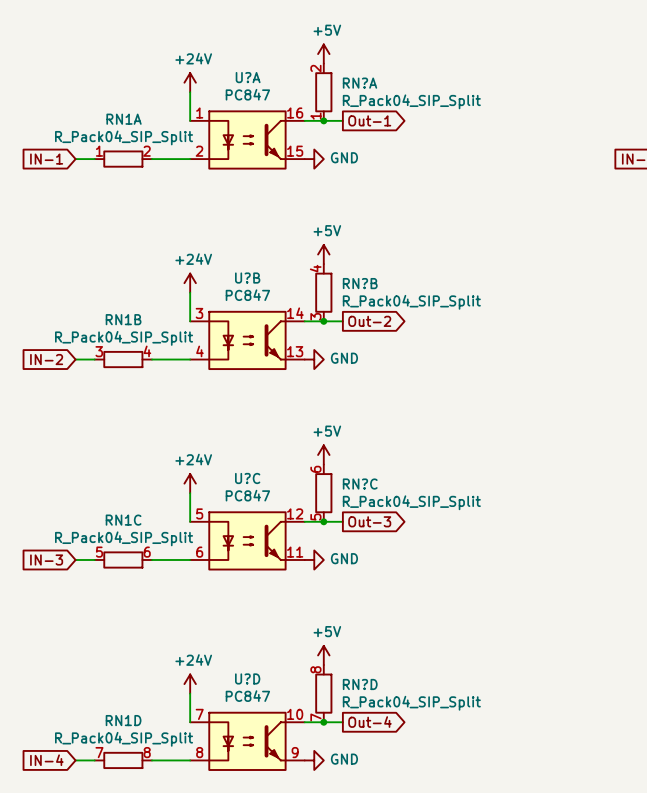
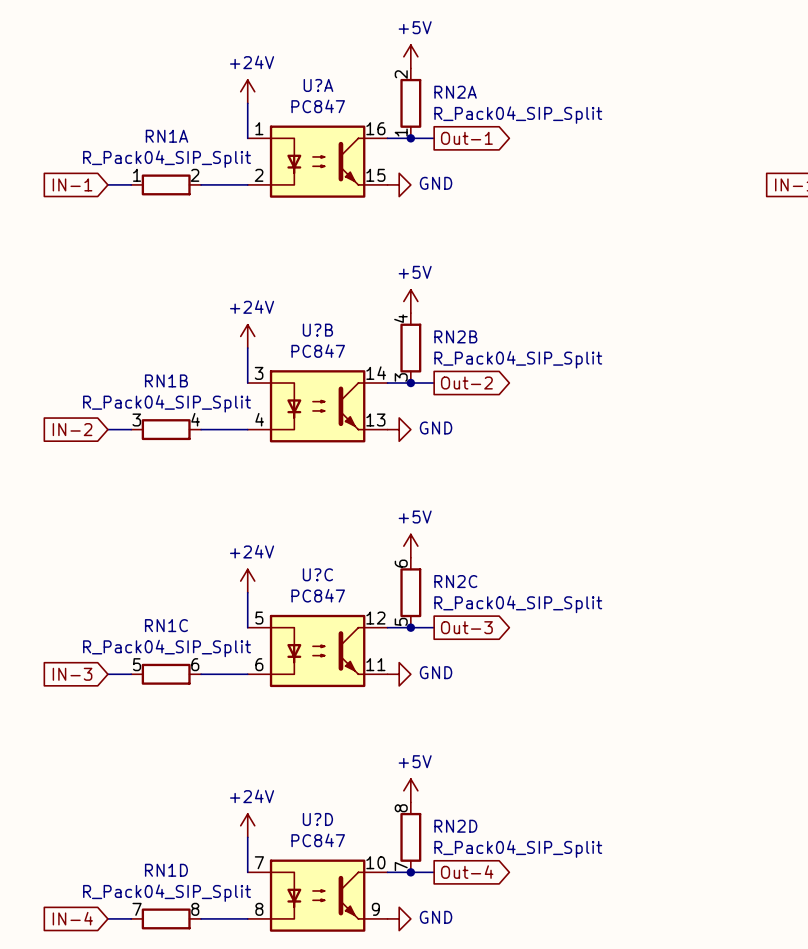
RN?A name: RN?A (359, 83) -> RN2A (455, 92)
RN?B name: RN?B (360, 283) -> RN2B (455, 336)
RN?C name: RN?C (360, 484) -> RN2C (455, 581)
RN?D name: RN?D (360, 684) -> RN2D (455, 826)

